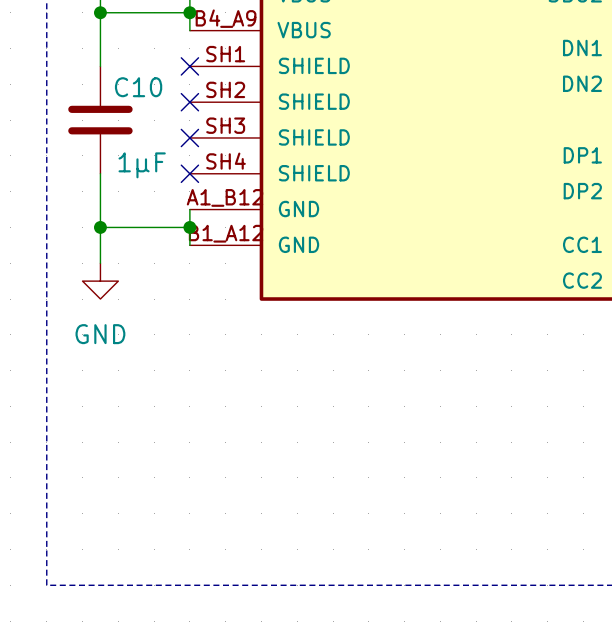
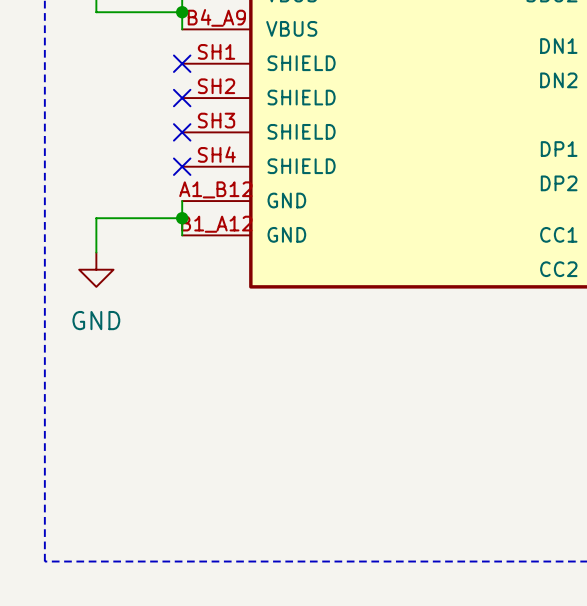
wire: (100, 12) (100, 66) -> none
junction: (100, 12) -> none
C10: 1µF (100, 120) -> none
wire: (100, 173) (100, 227) -> none
junction: (100, 227) -> none

